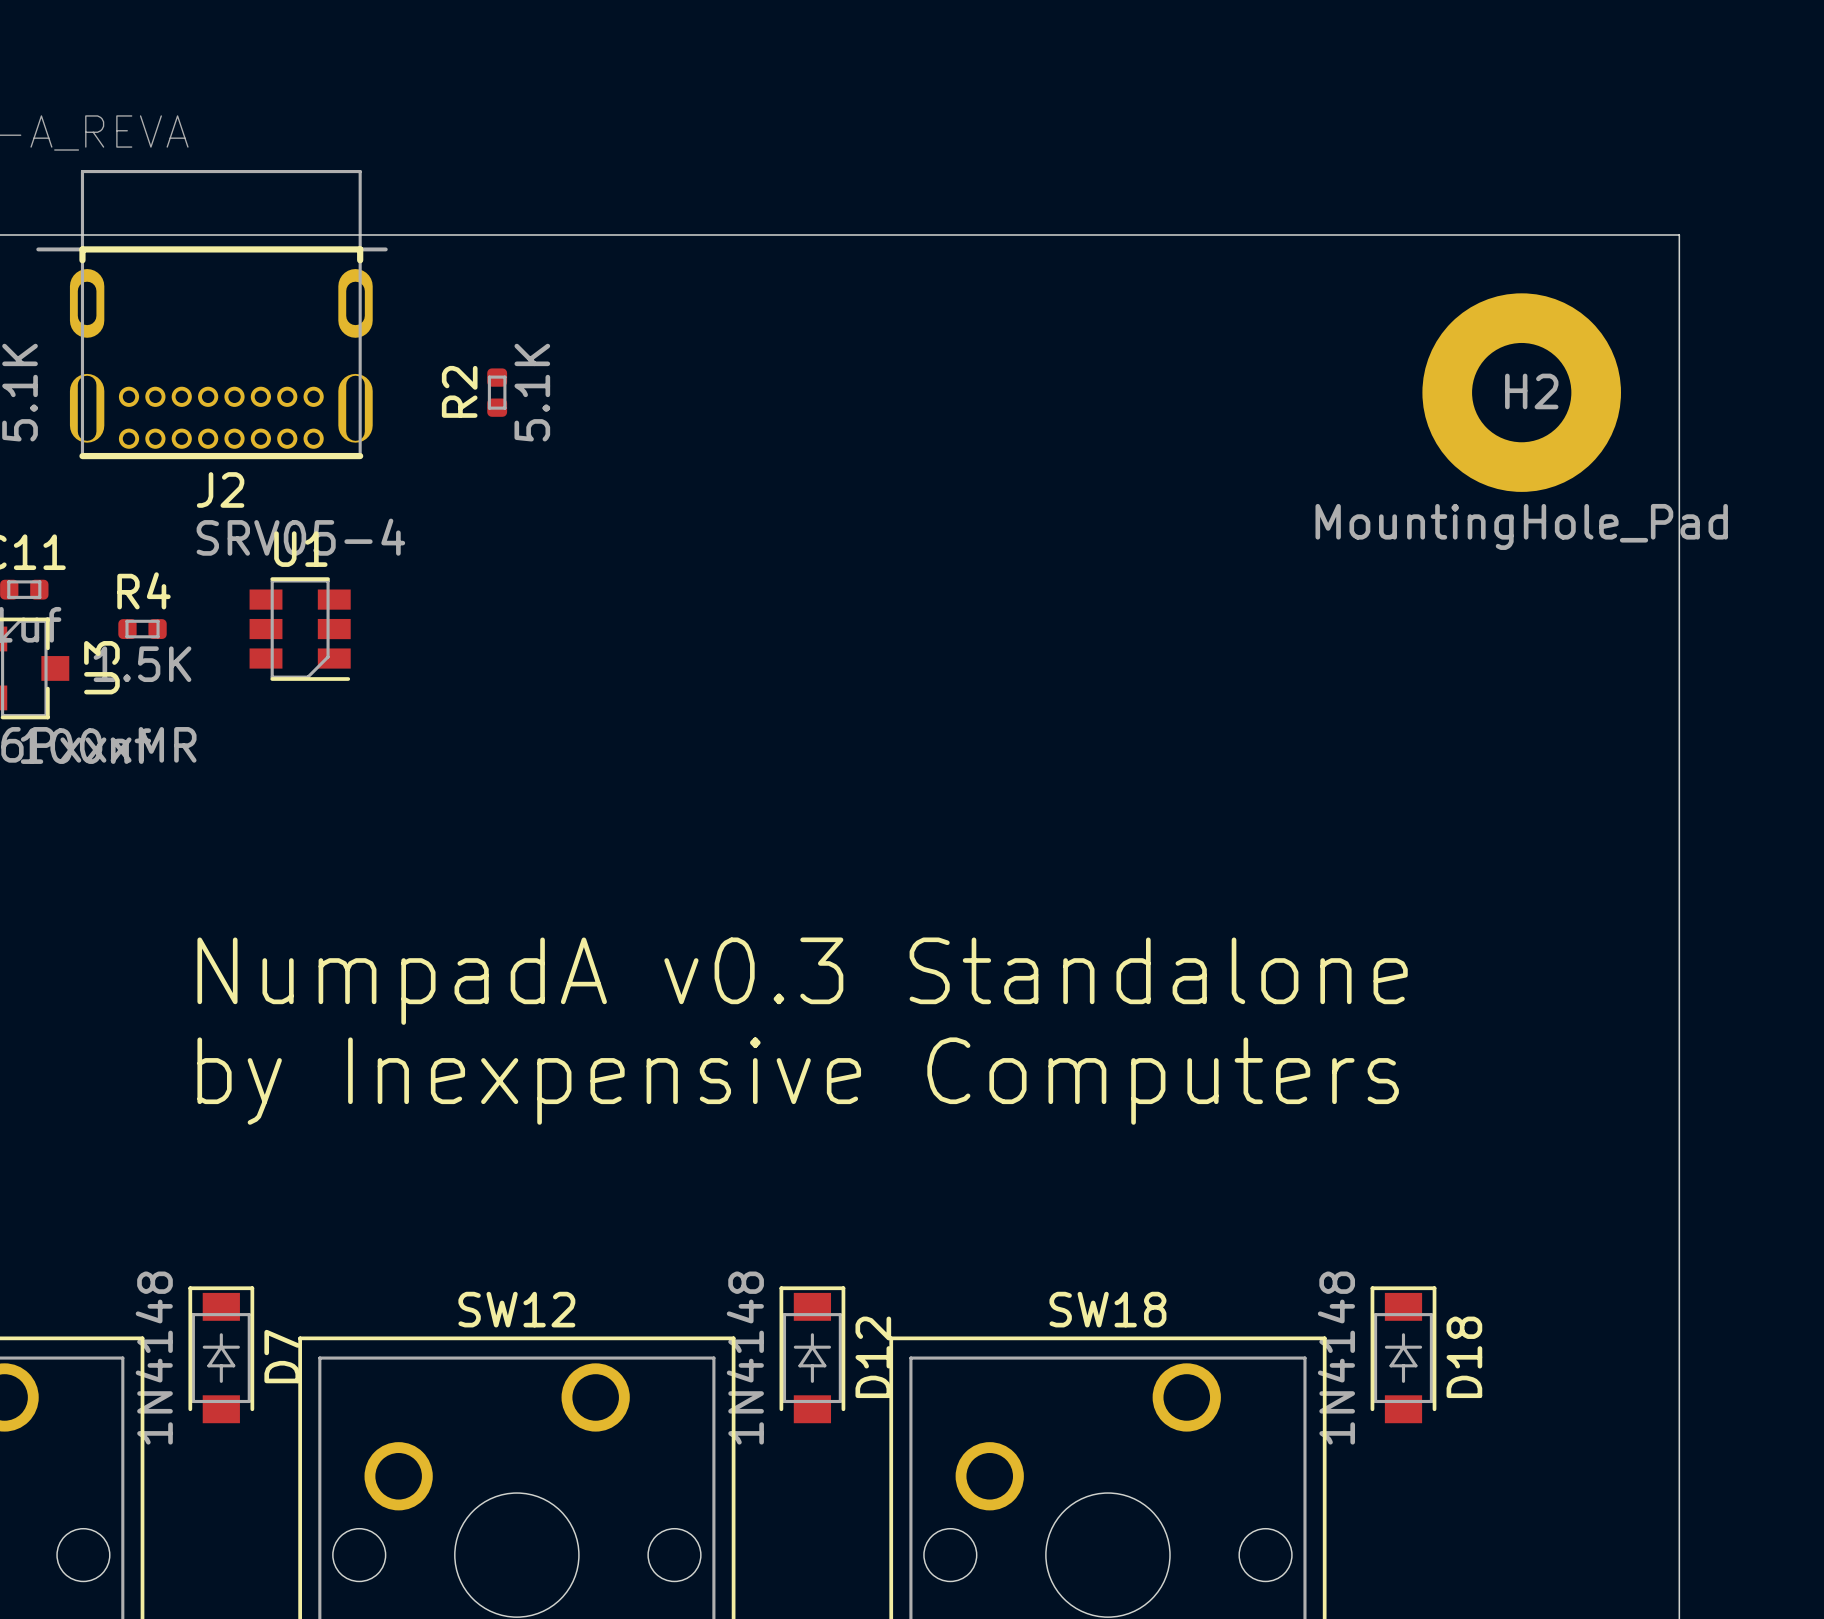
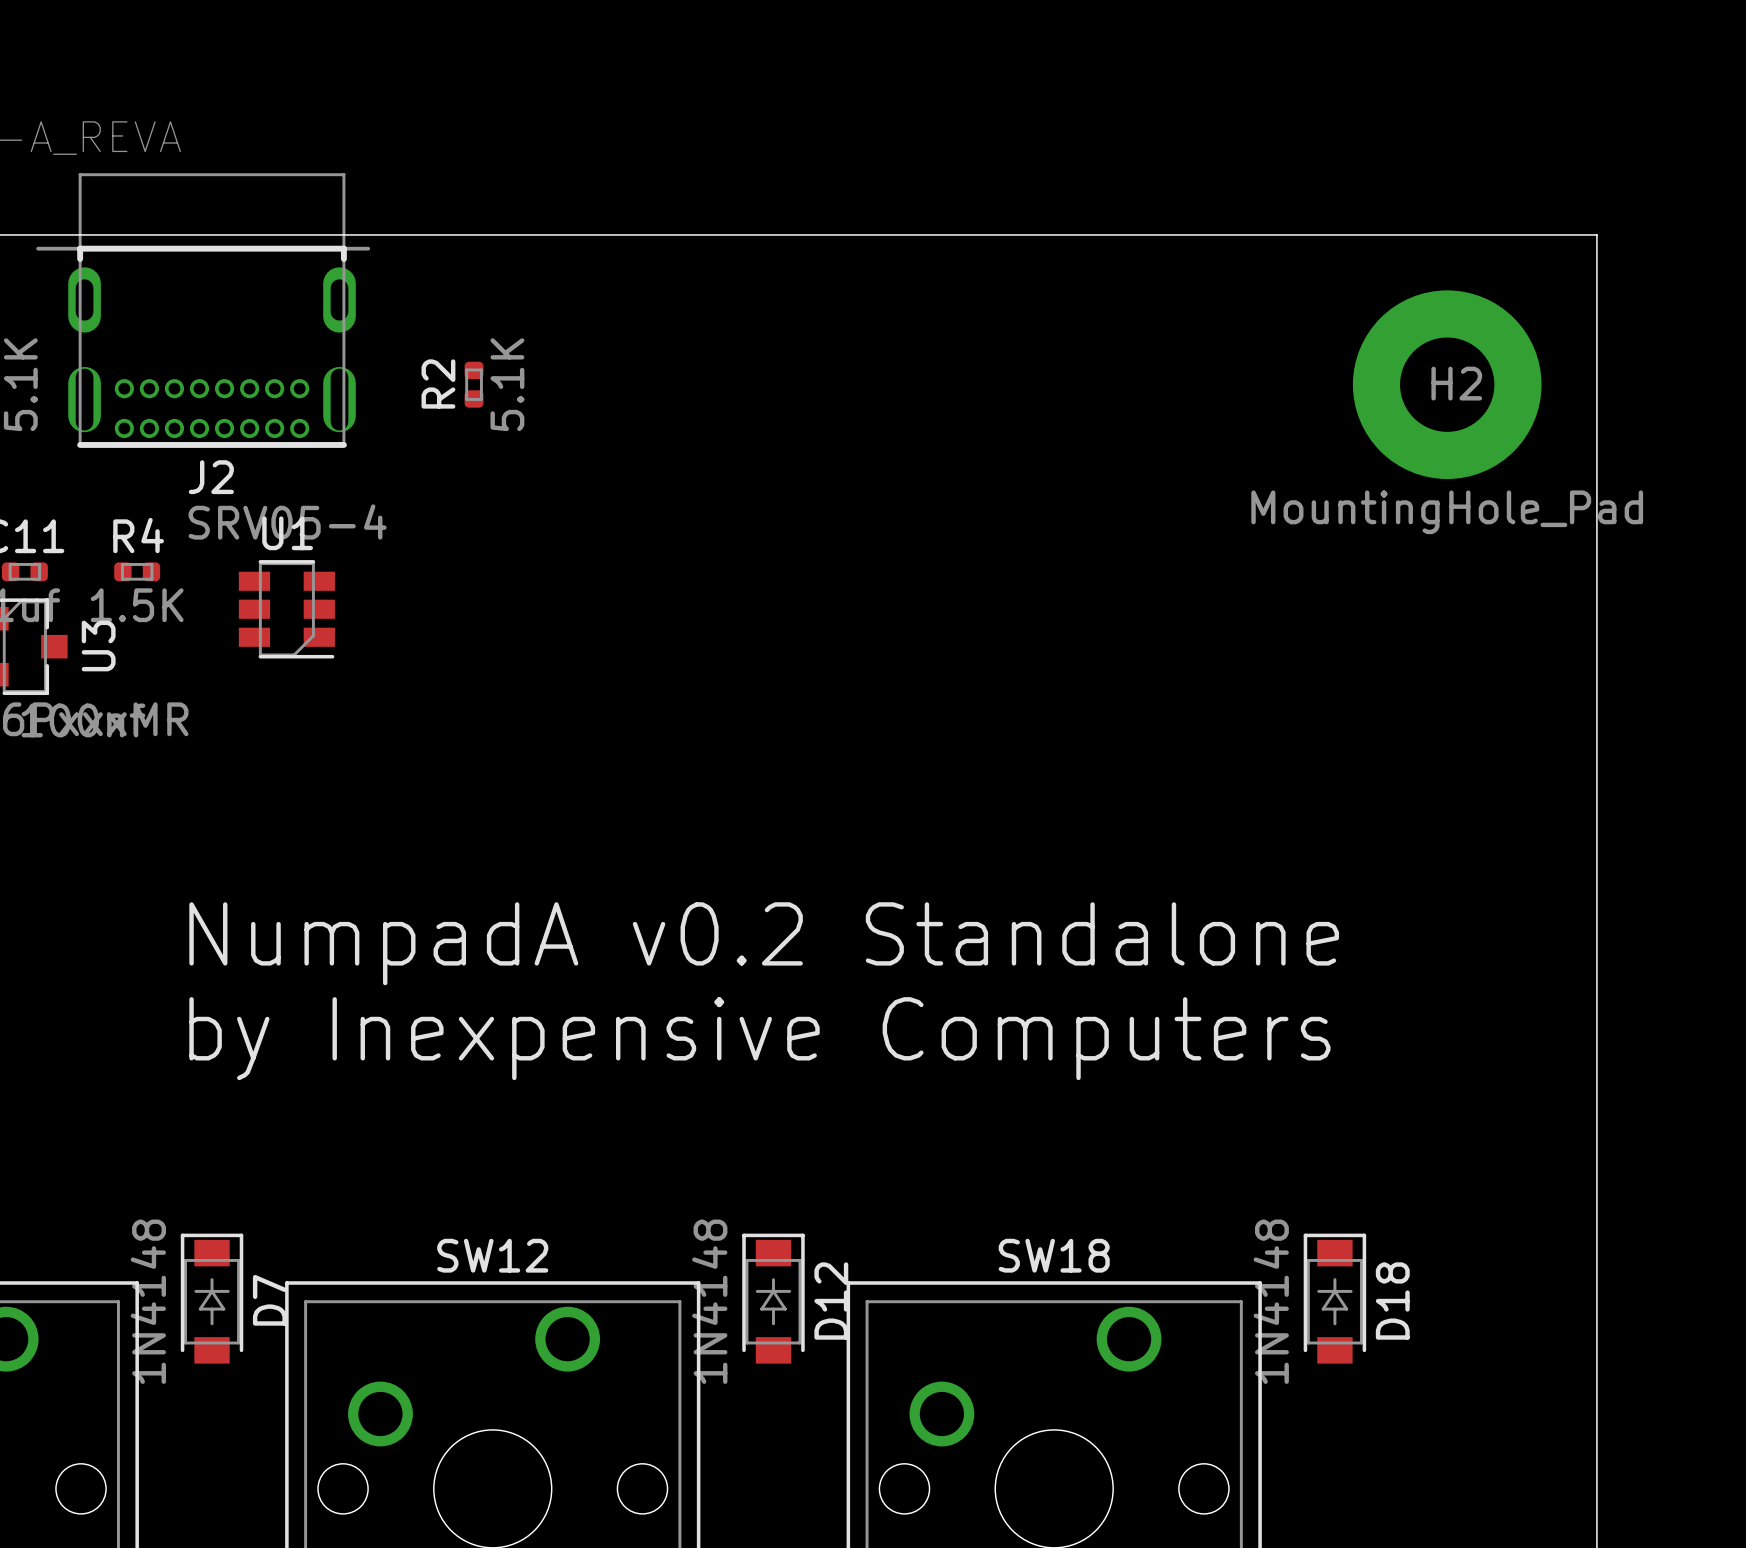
R4 position: (142, 629) -> (137, 571)
text: NumpadA v0.3 Standalone (802, 981) -> NumpadA v0.2 Standalone (764, 943)

